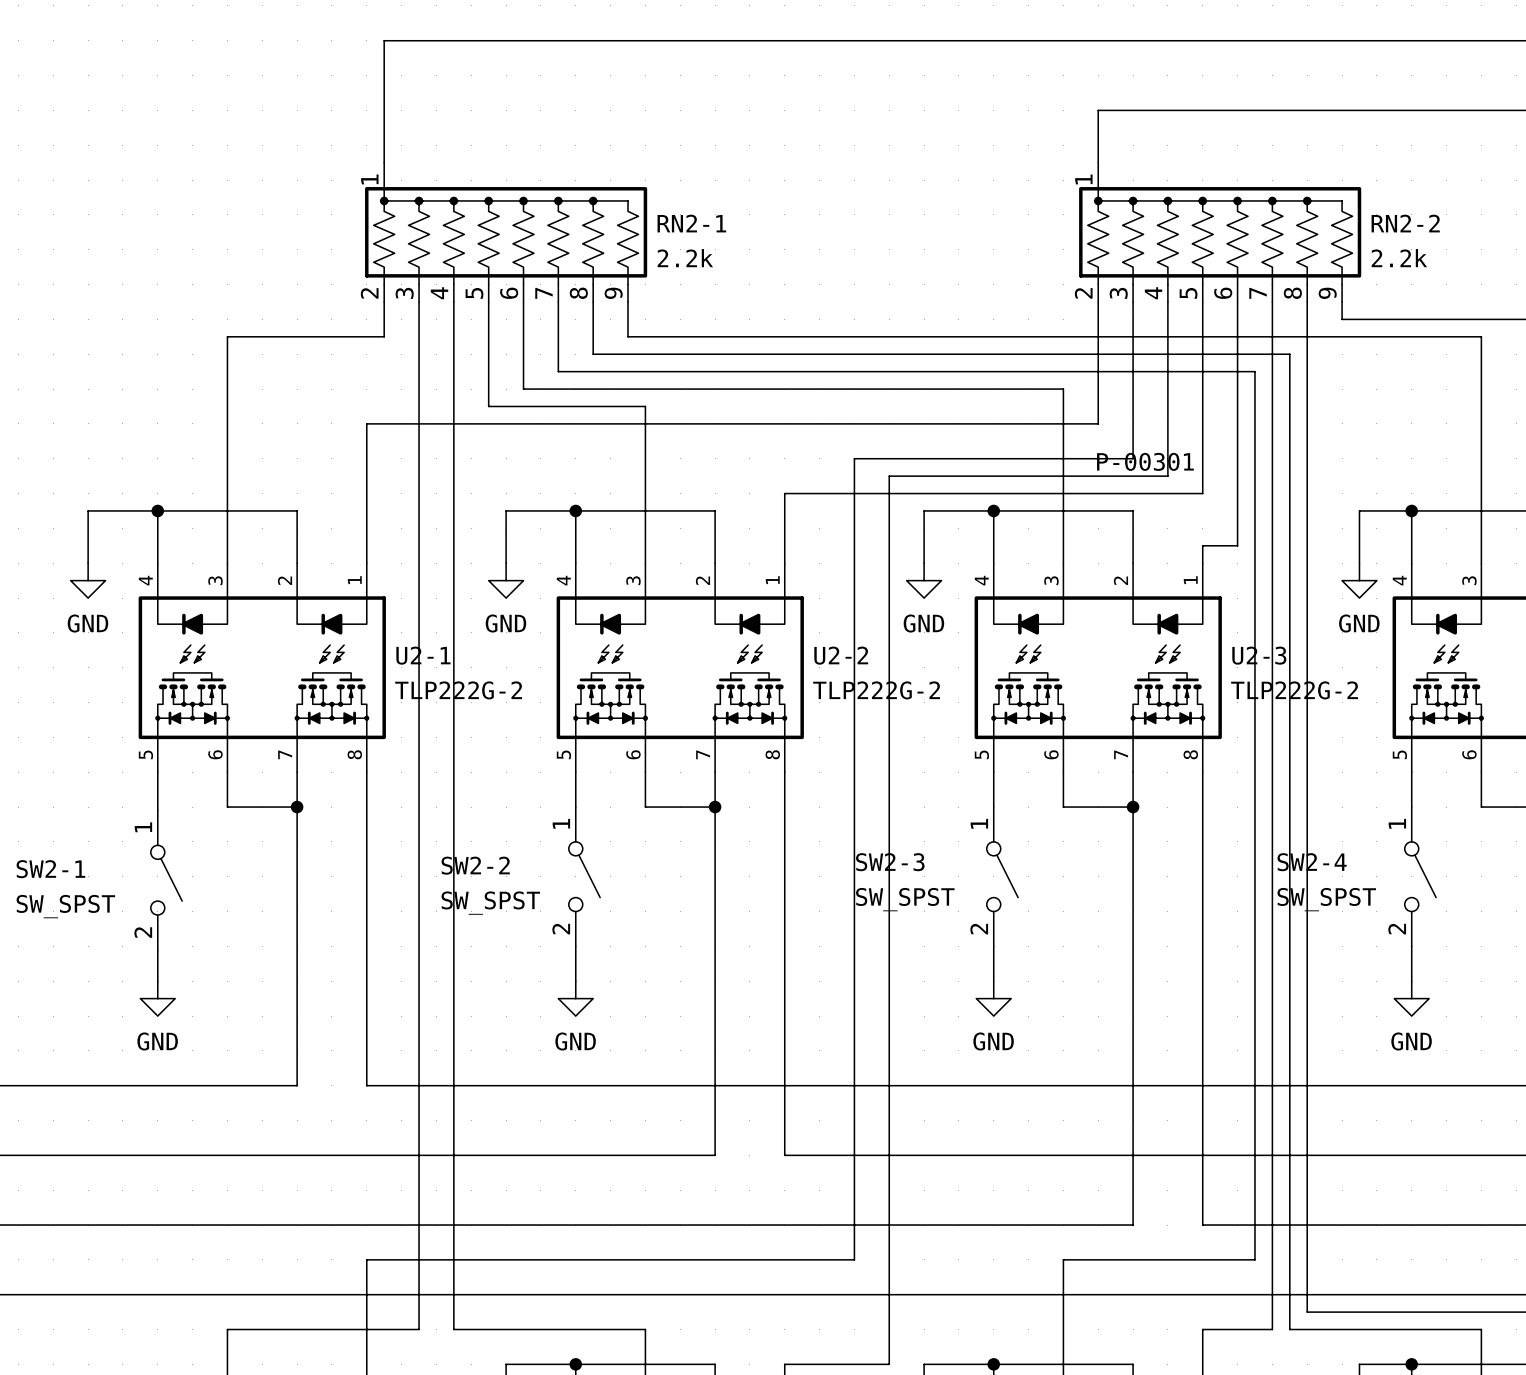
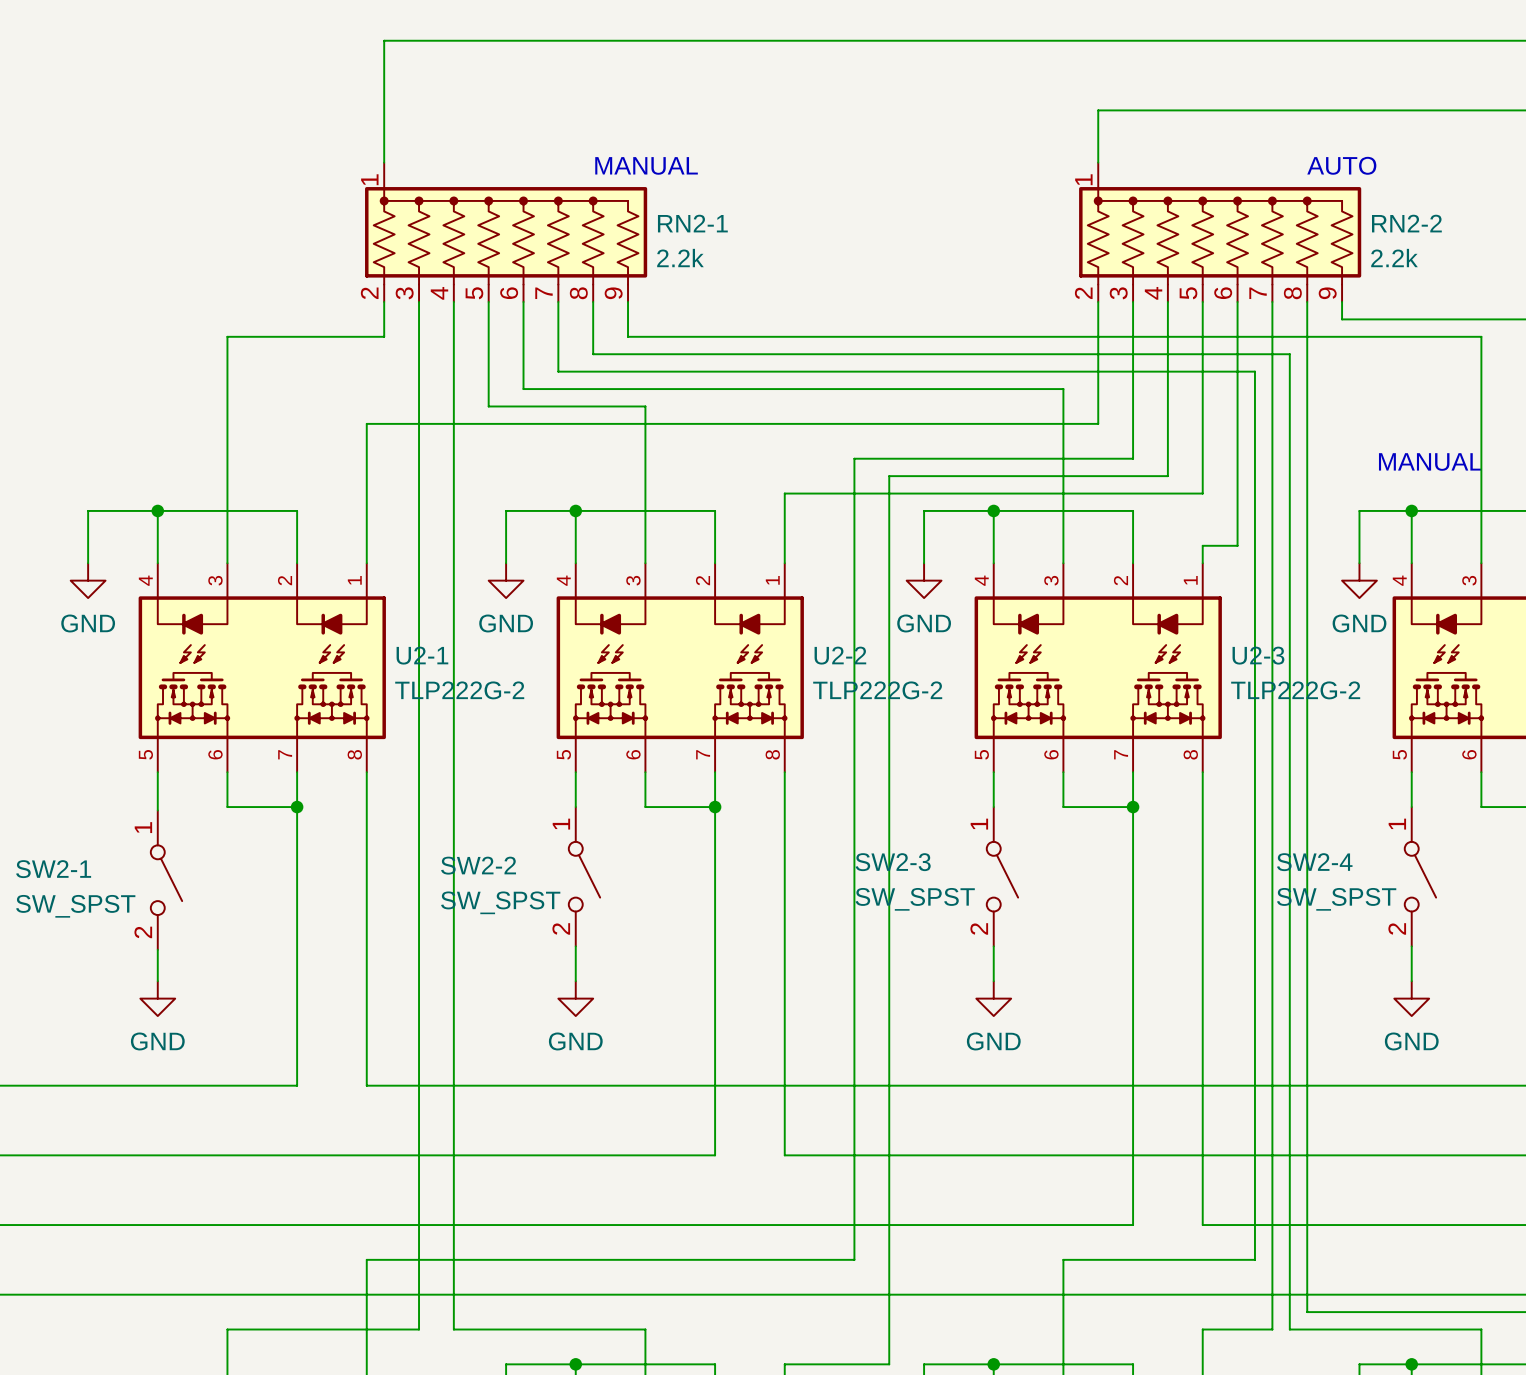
text: none -> MANUAL (646, 165)
text: none -> AUTO (1341, 165)
text: P-00301 (1145, 461) -> none
text: none -> MANUAL (1430, 461)

